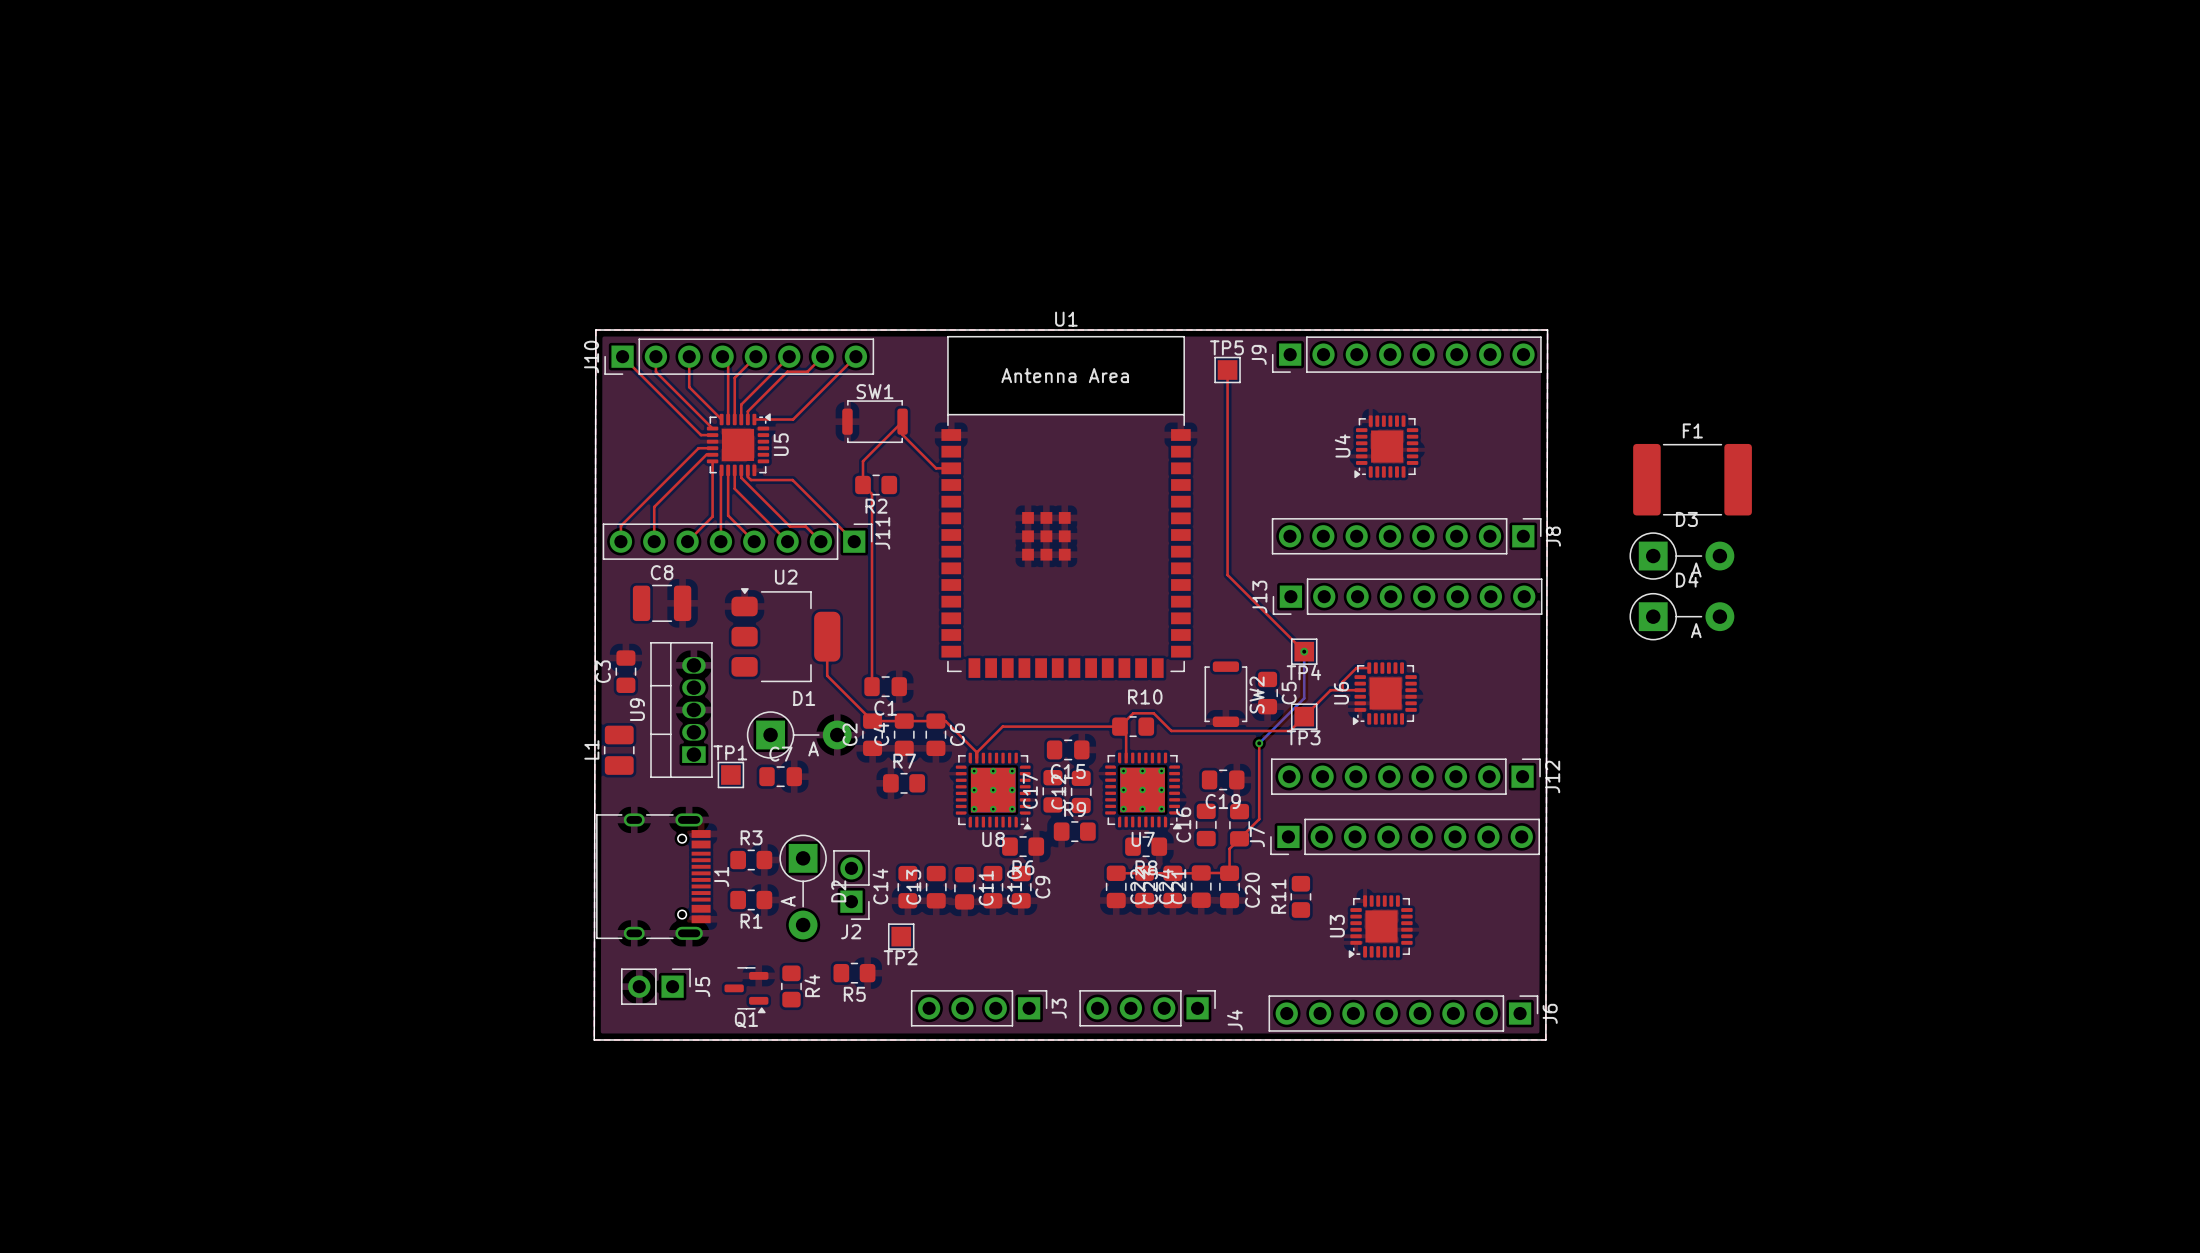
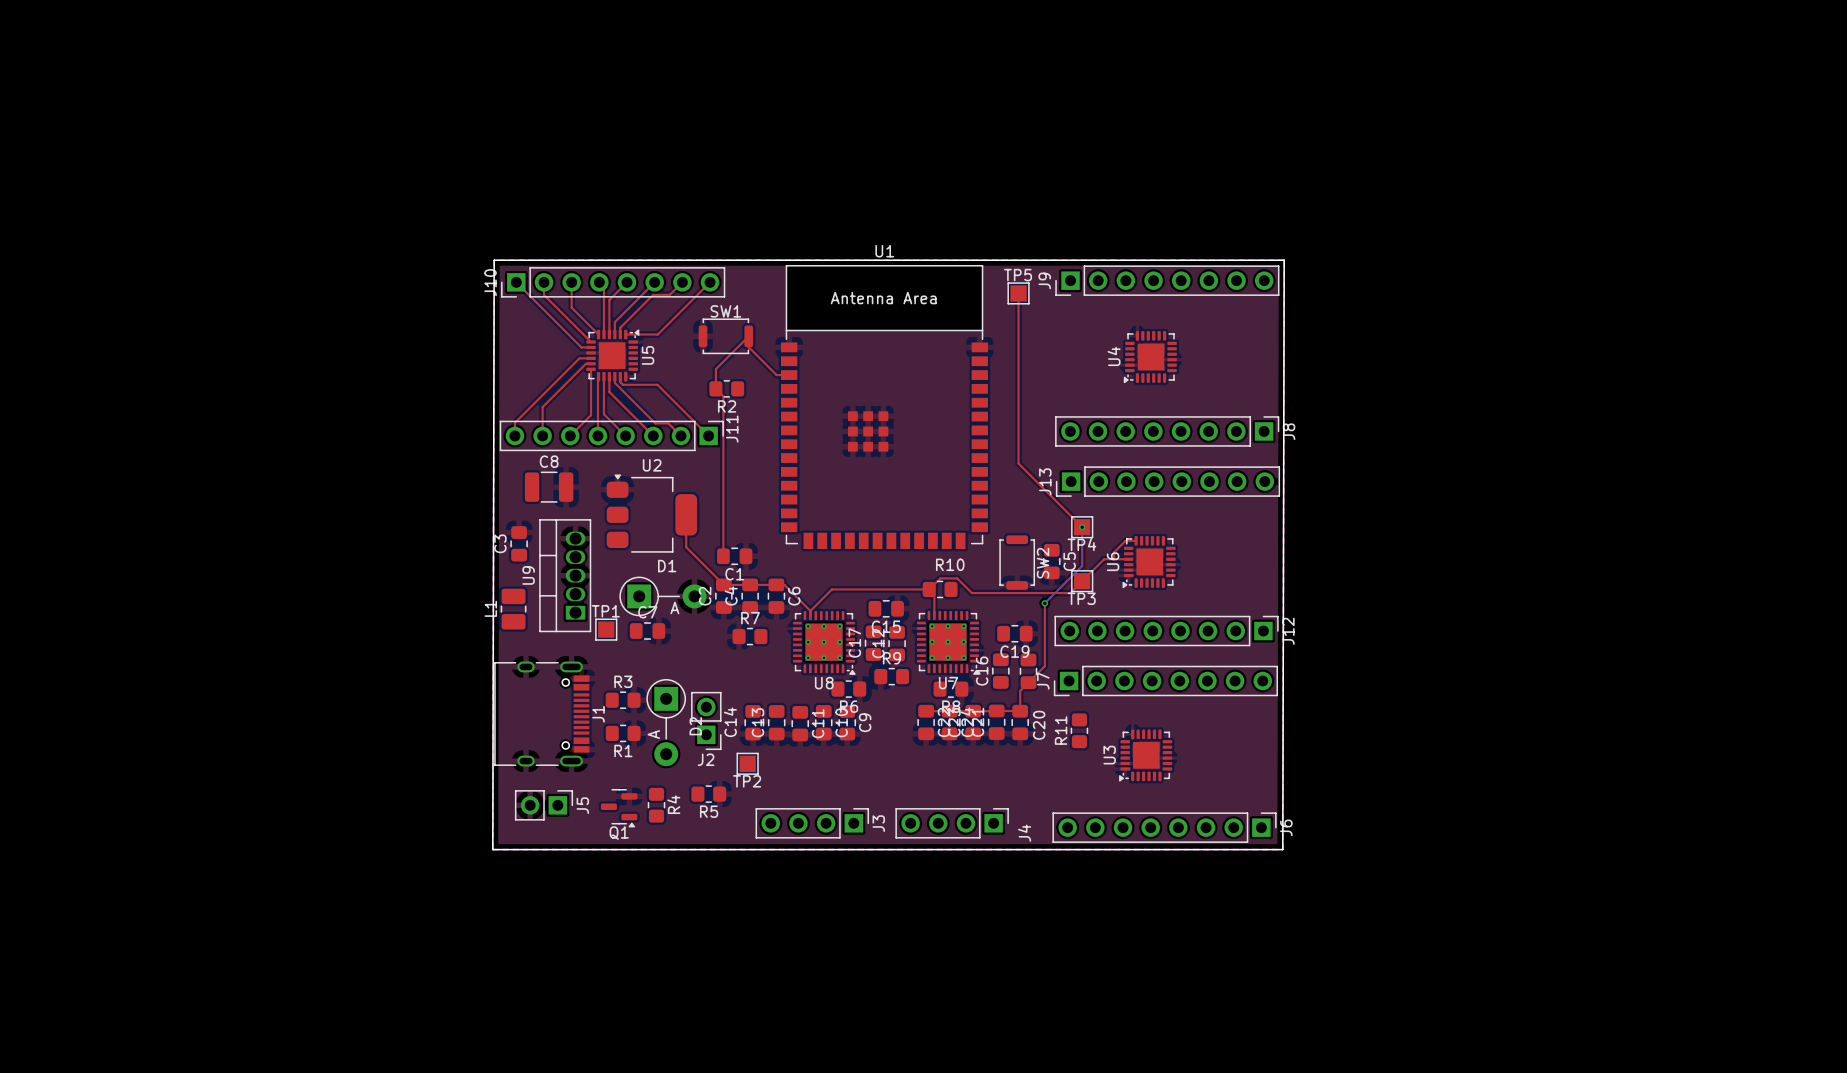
F1: (1692, 479) -> none
D3: (1681, 556) -> none
D4: (1681, 616) -> none

